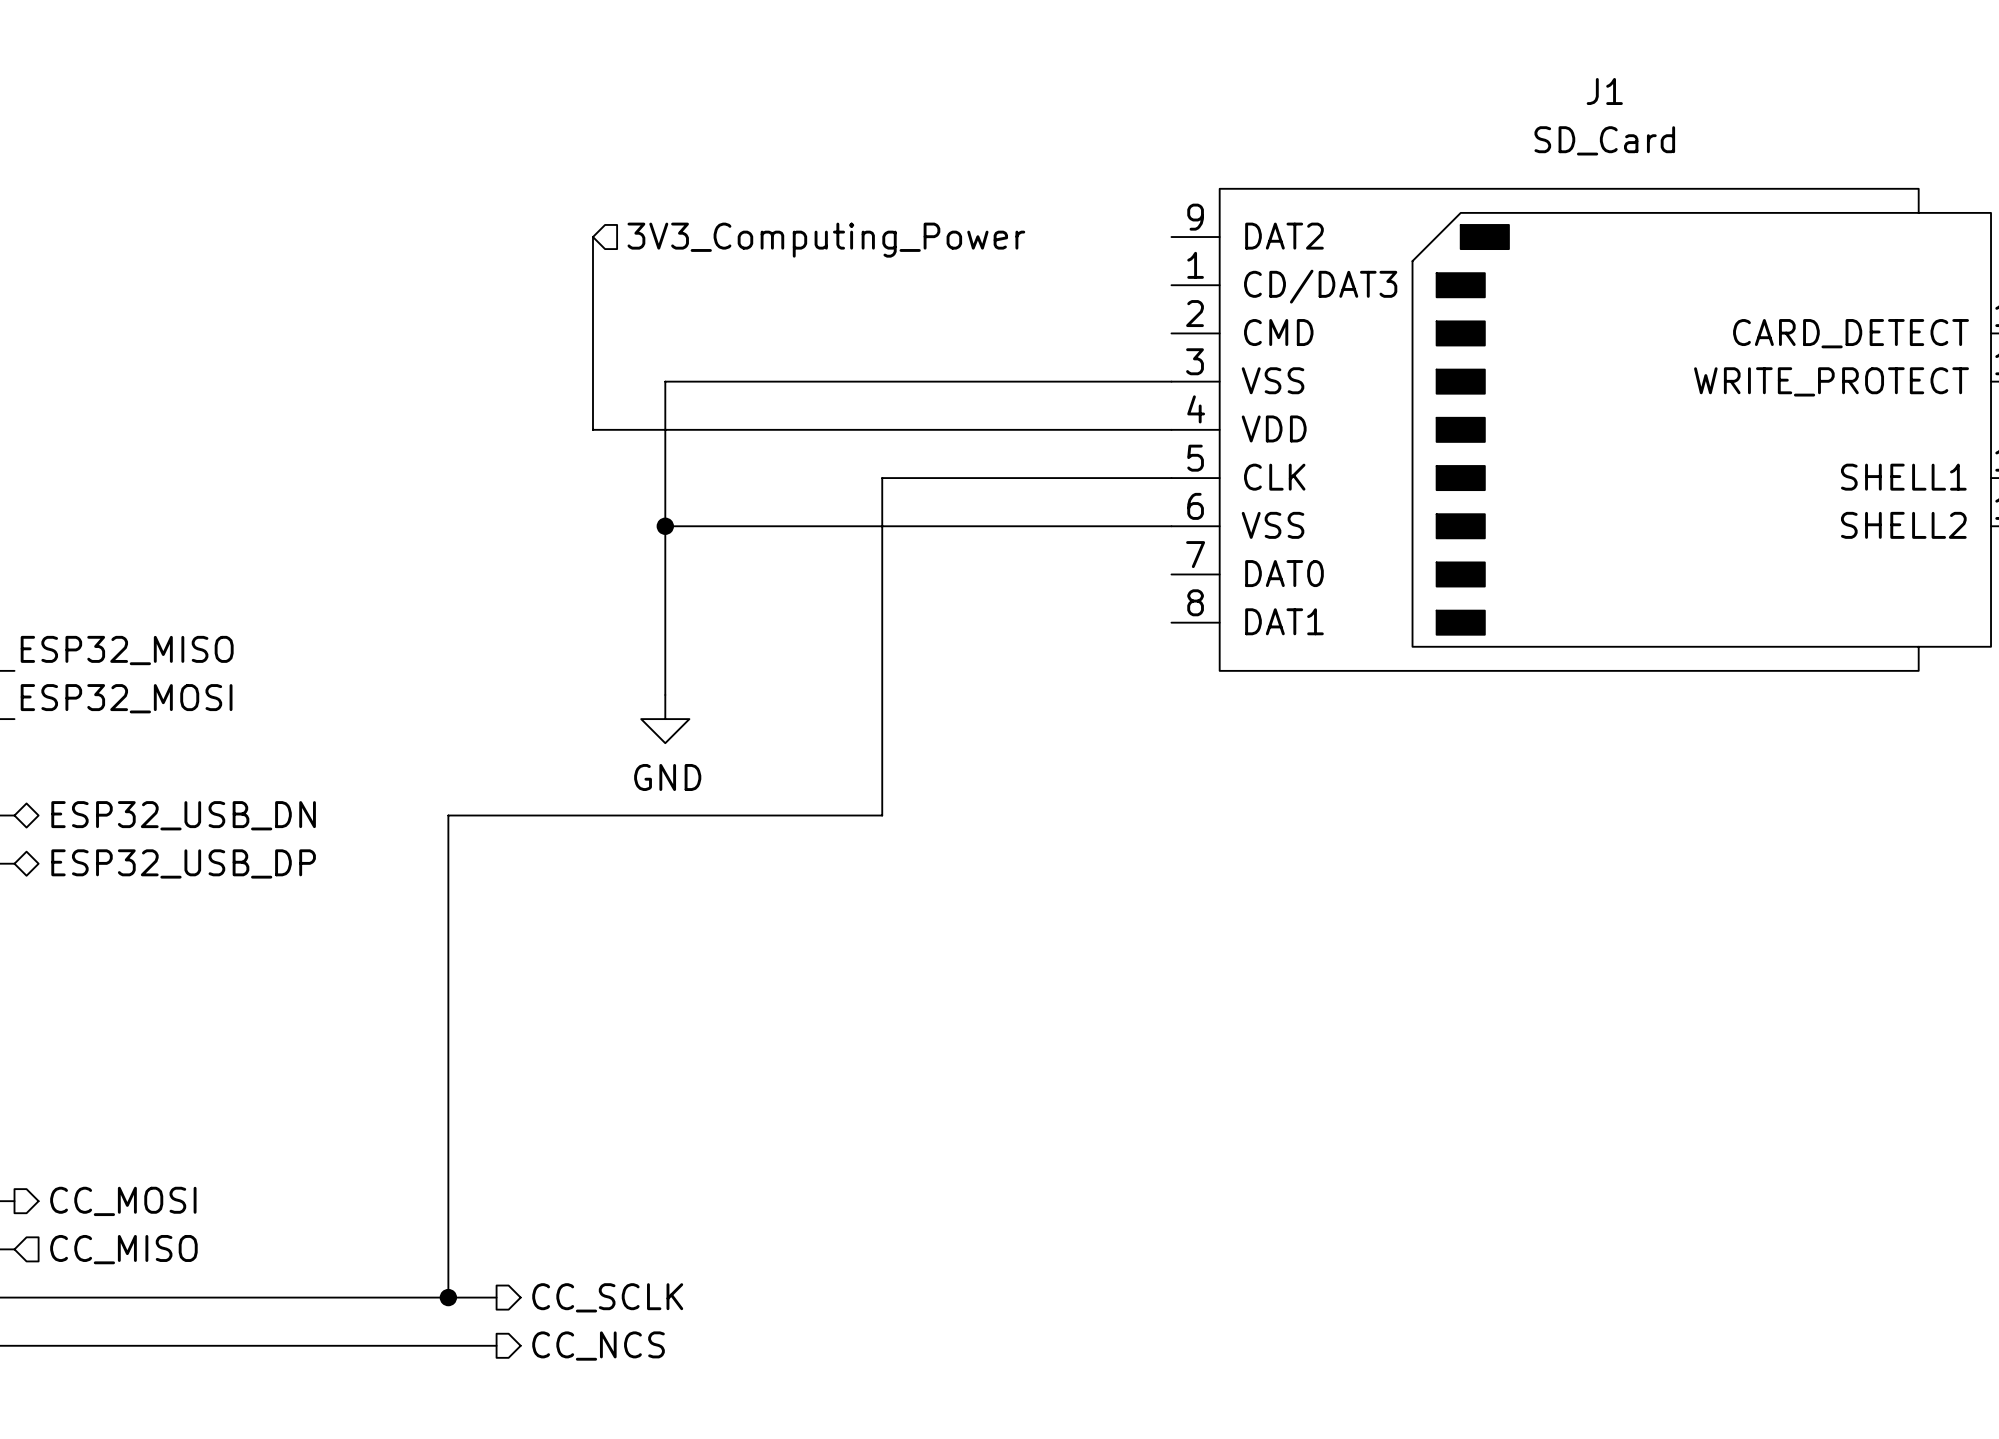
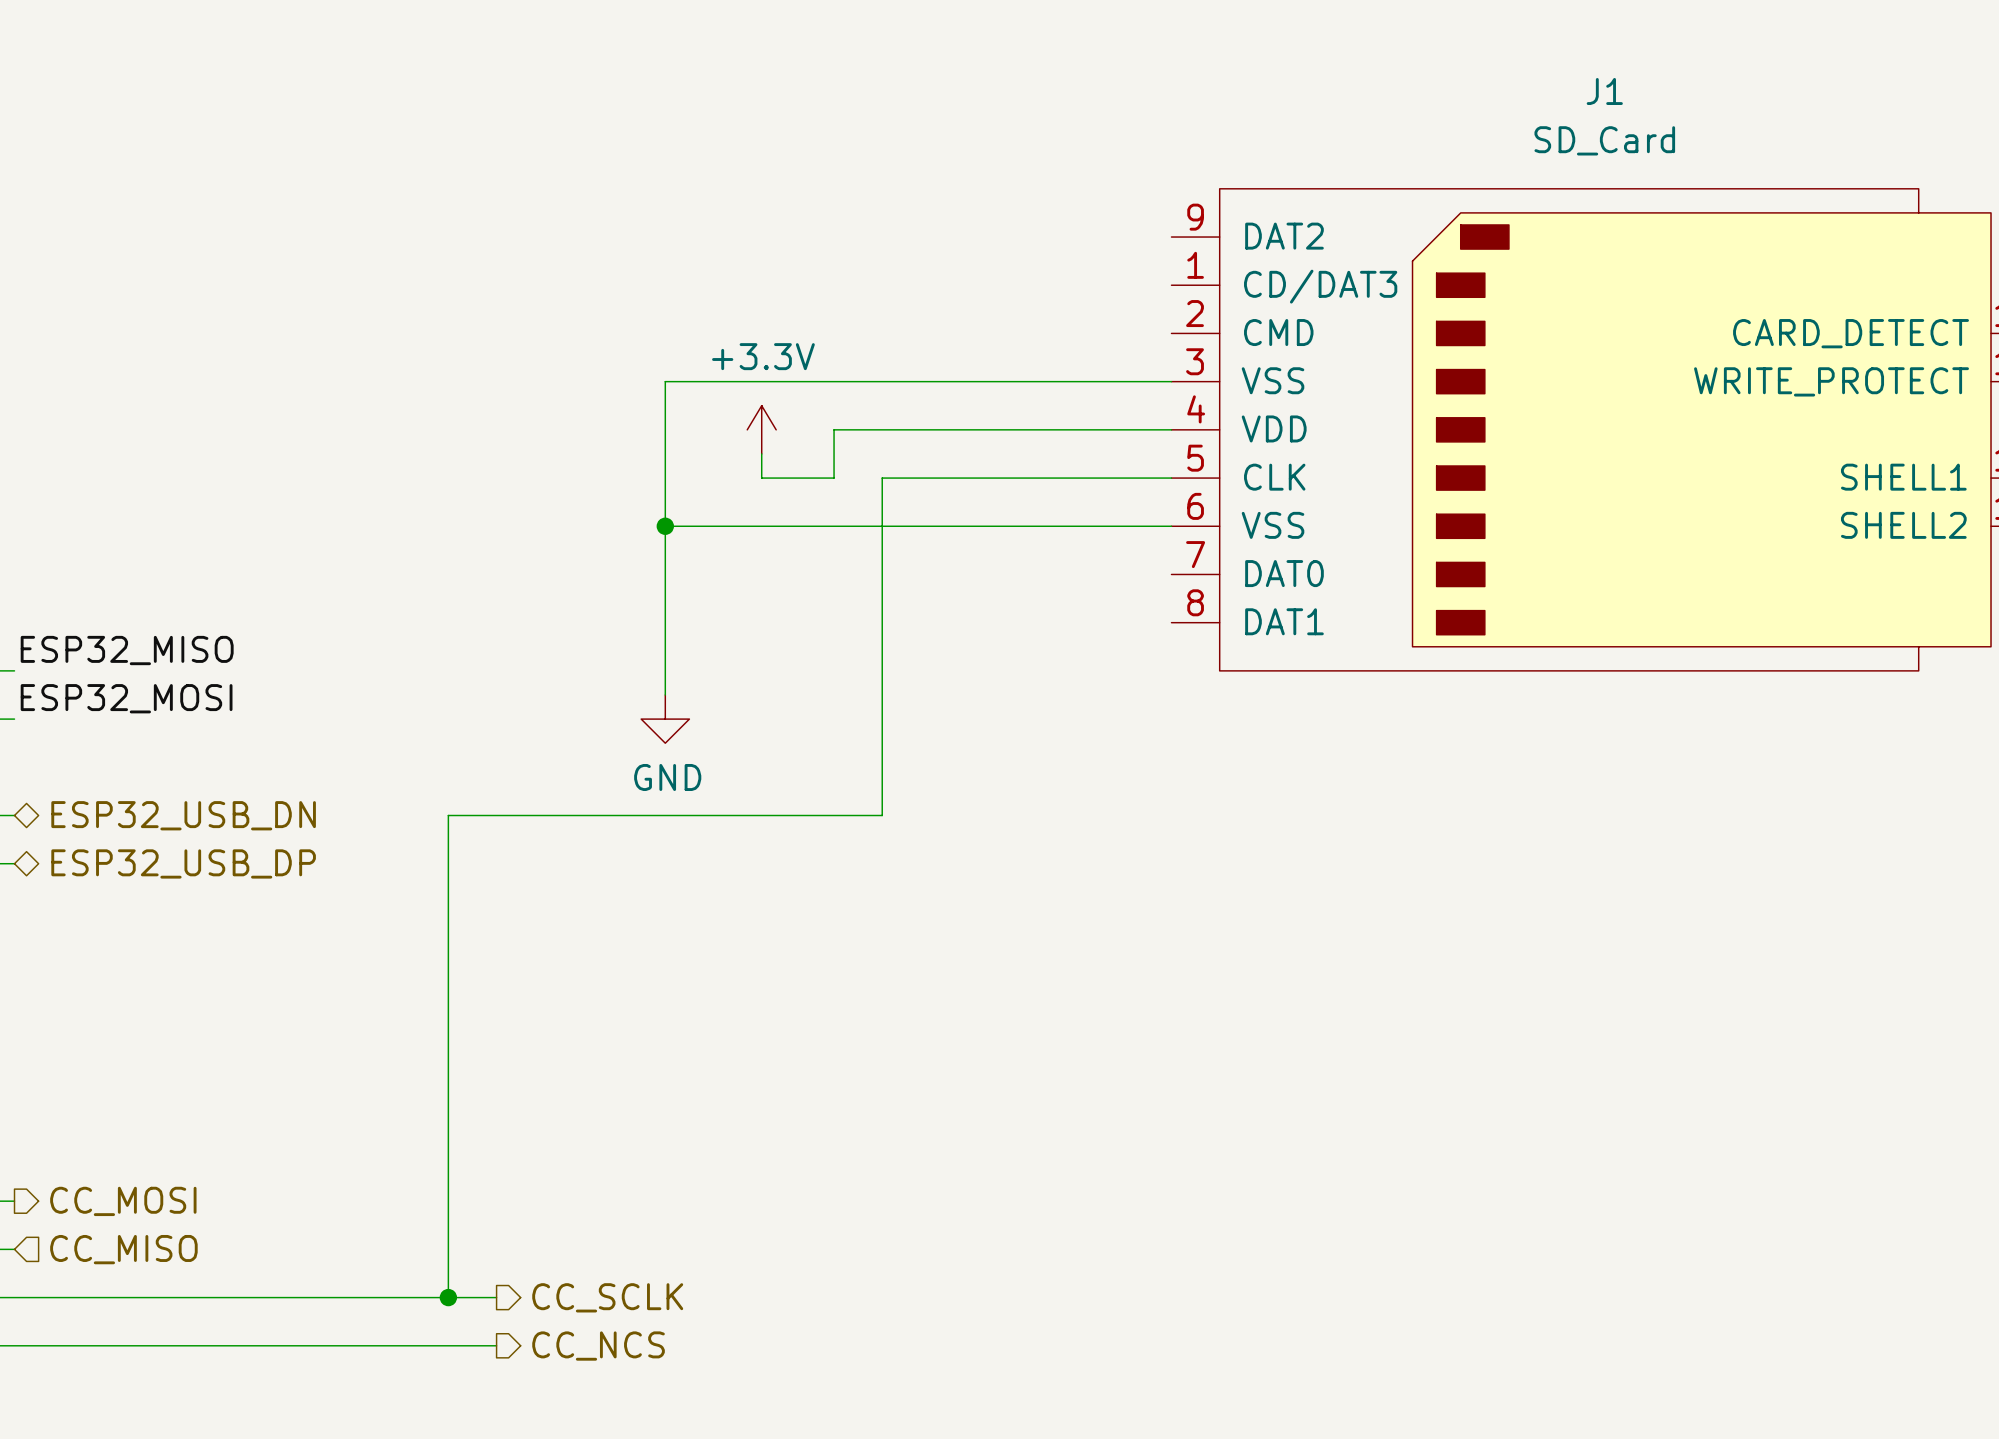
wire: (592, 237) (592, 429) (834, 429) -> (761, 453) (761, 478) (834, 478) (834, 429)
hierarchical label: 3V3_Computing_Power (826, 240) -> none
power symbol: none -> +3.3V (761, 429)

